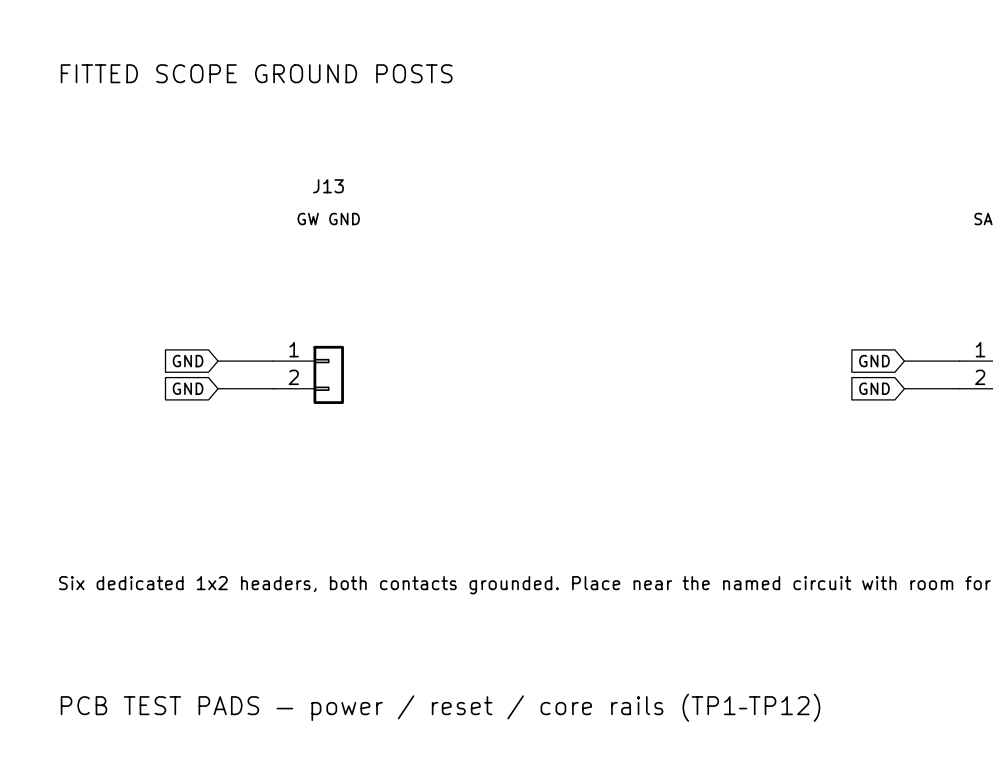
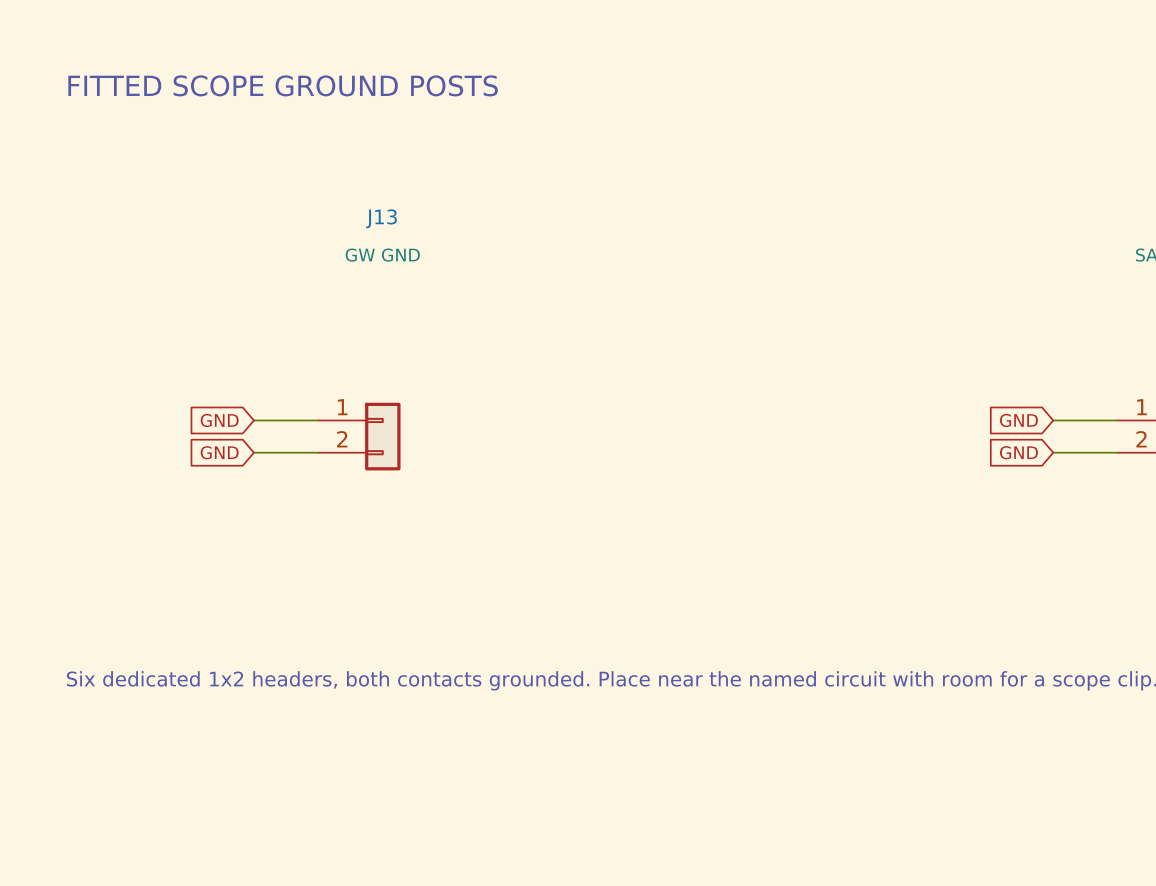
text: PCB TEST PADS — power / reset / core rails (TP1–TP12) (440, 707) -> none

